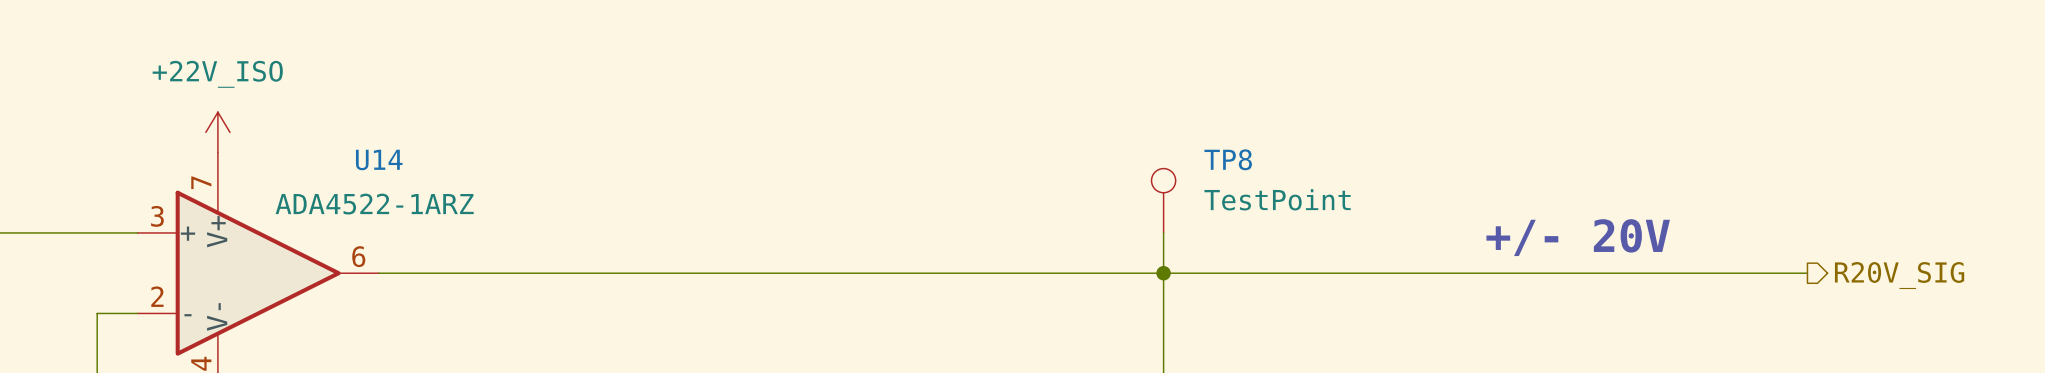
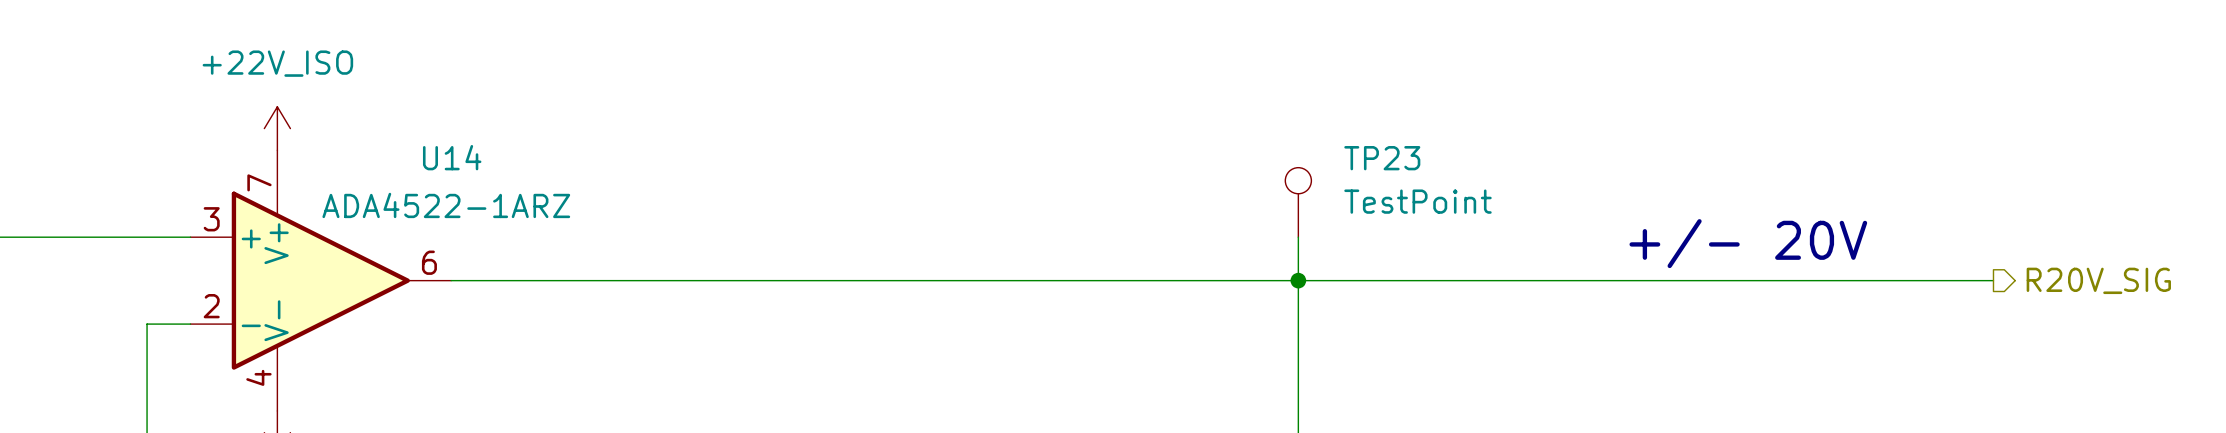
TP8 name: TP8 (1228, 159) -> TP23 (1382, 158)

